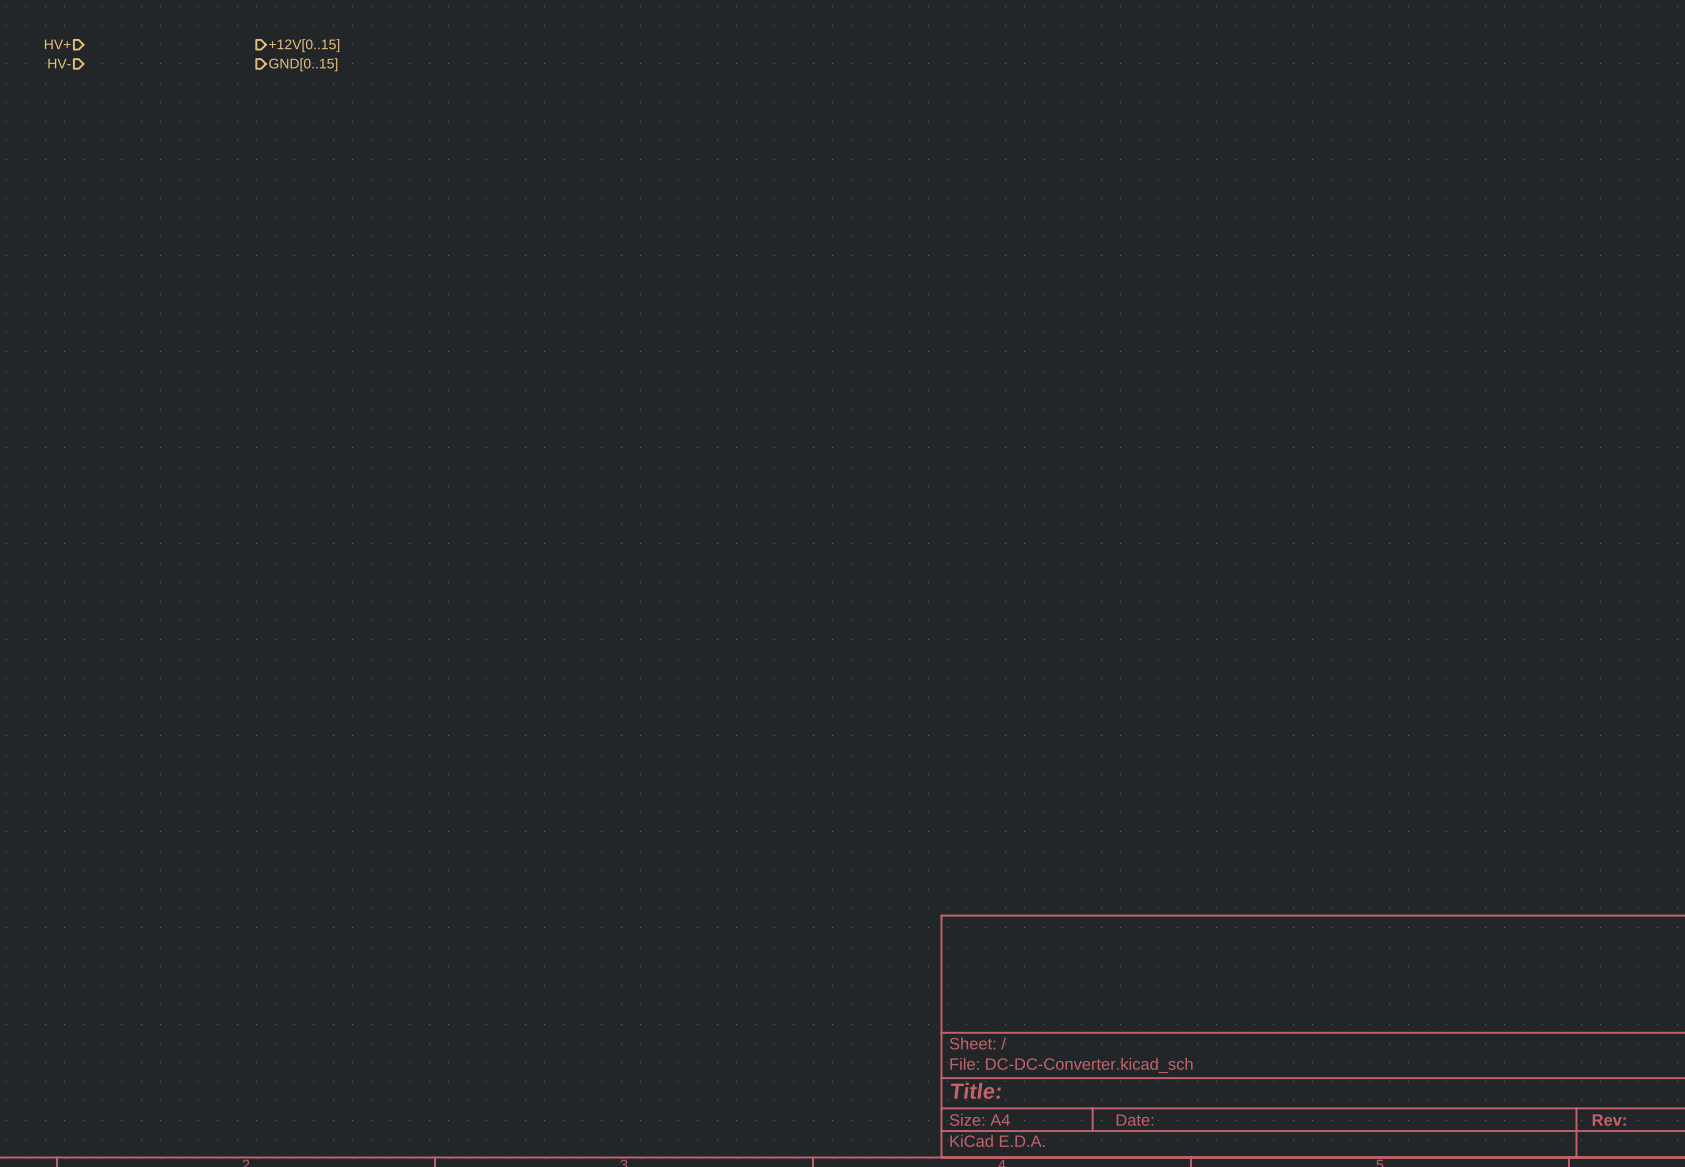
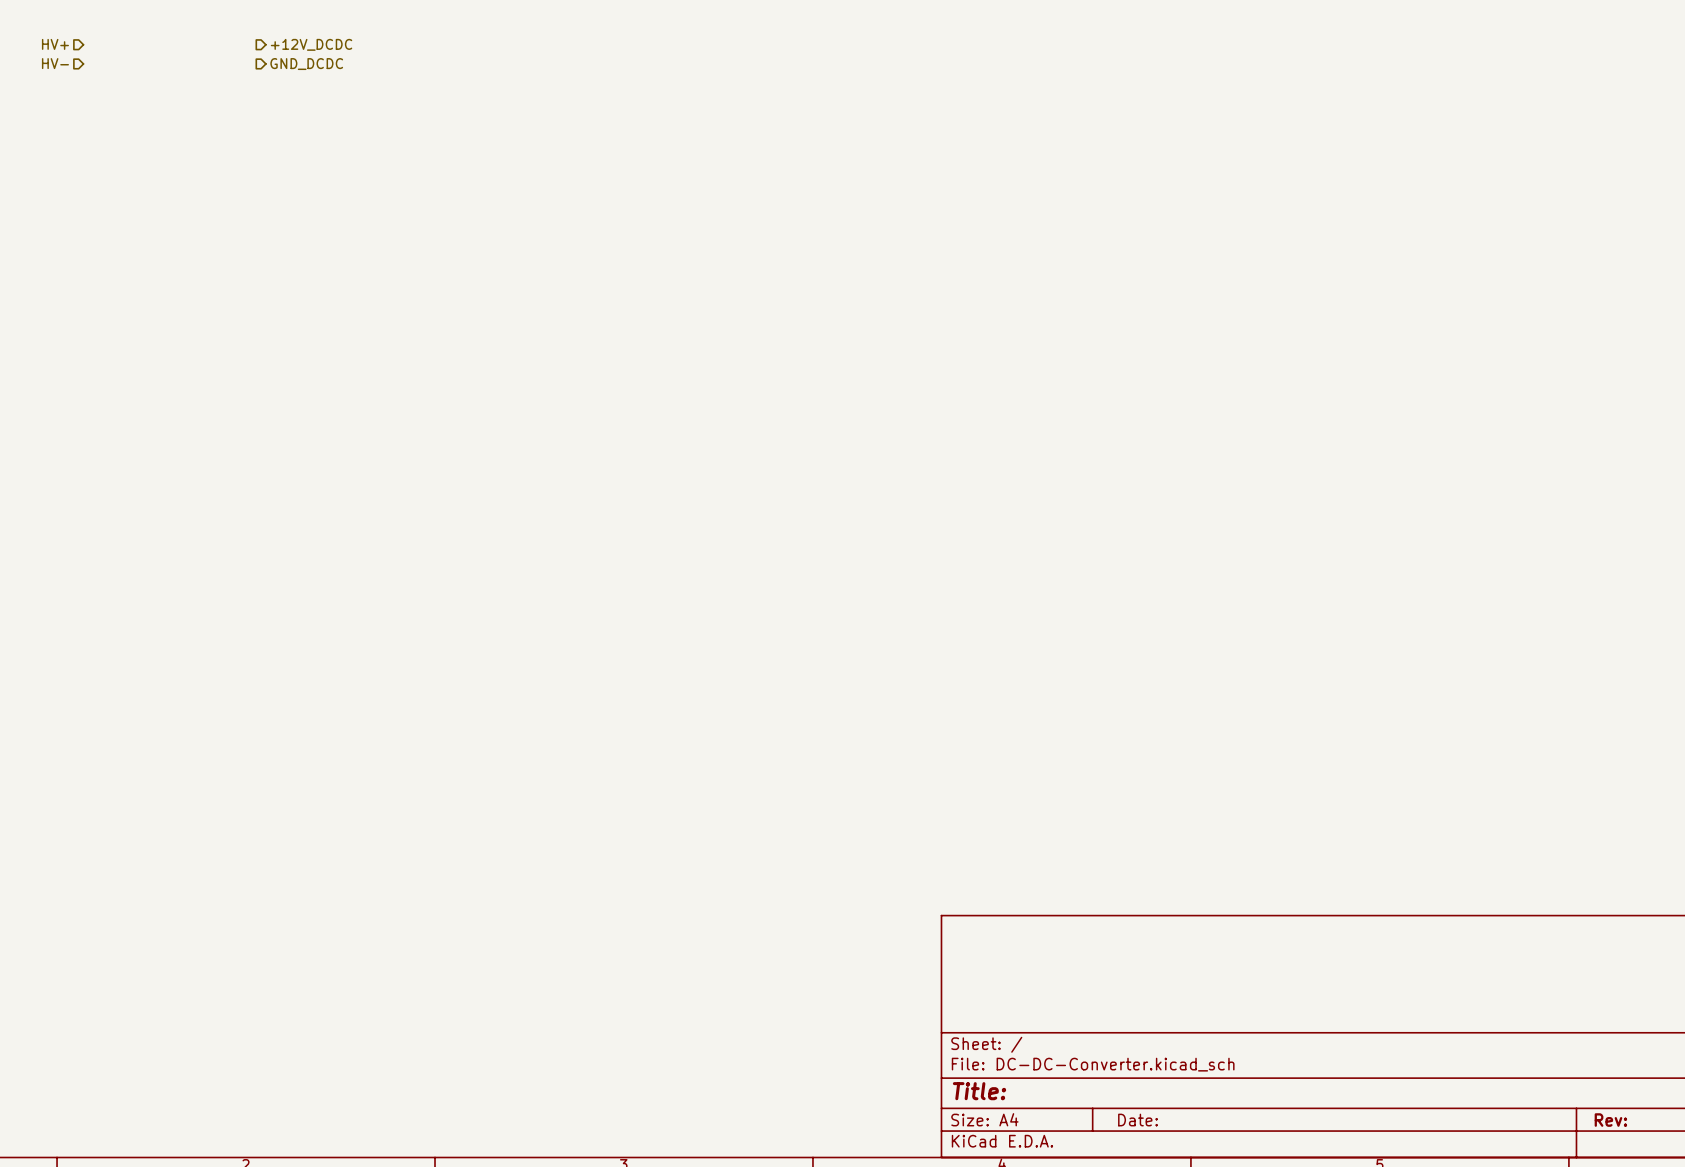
hierarchical label: +12V[0..15] (304, 45) -> +12V_DCDC (311, 44)
hierarchical label: GND[0..15] (303, 64) -> GND_DCDC (306, 64)

